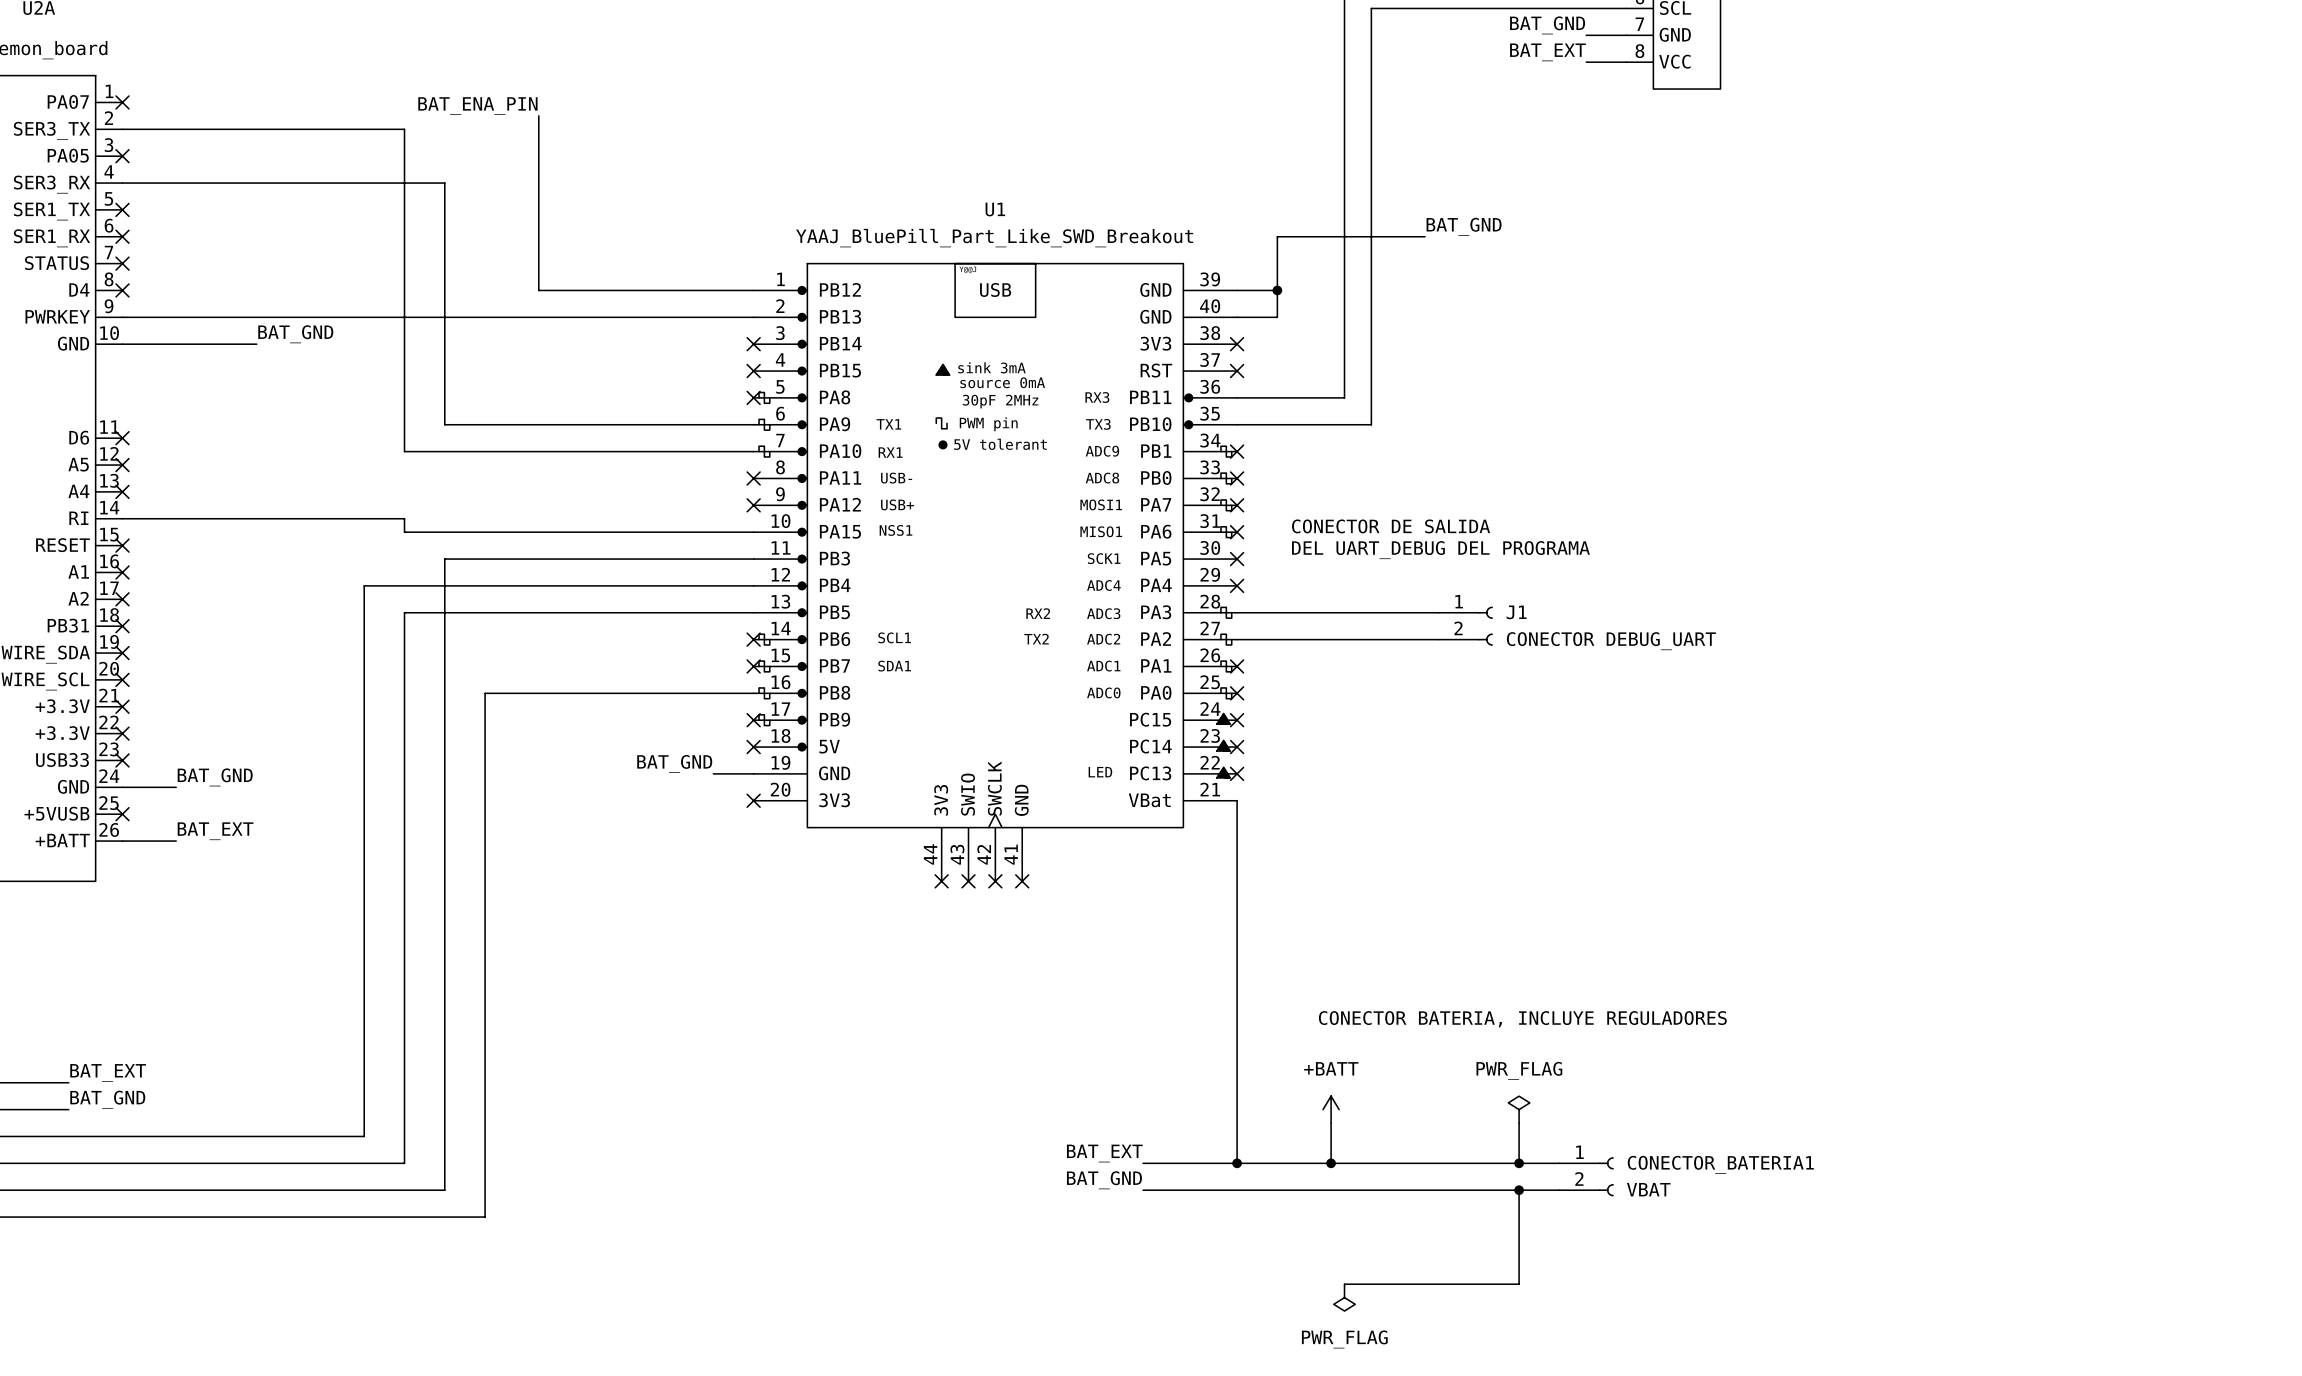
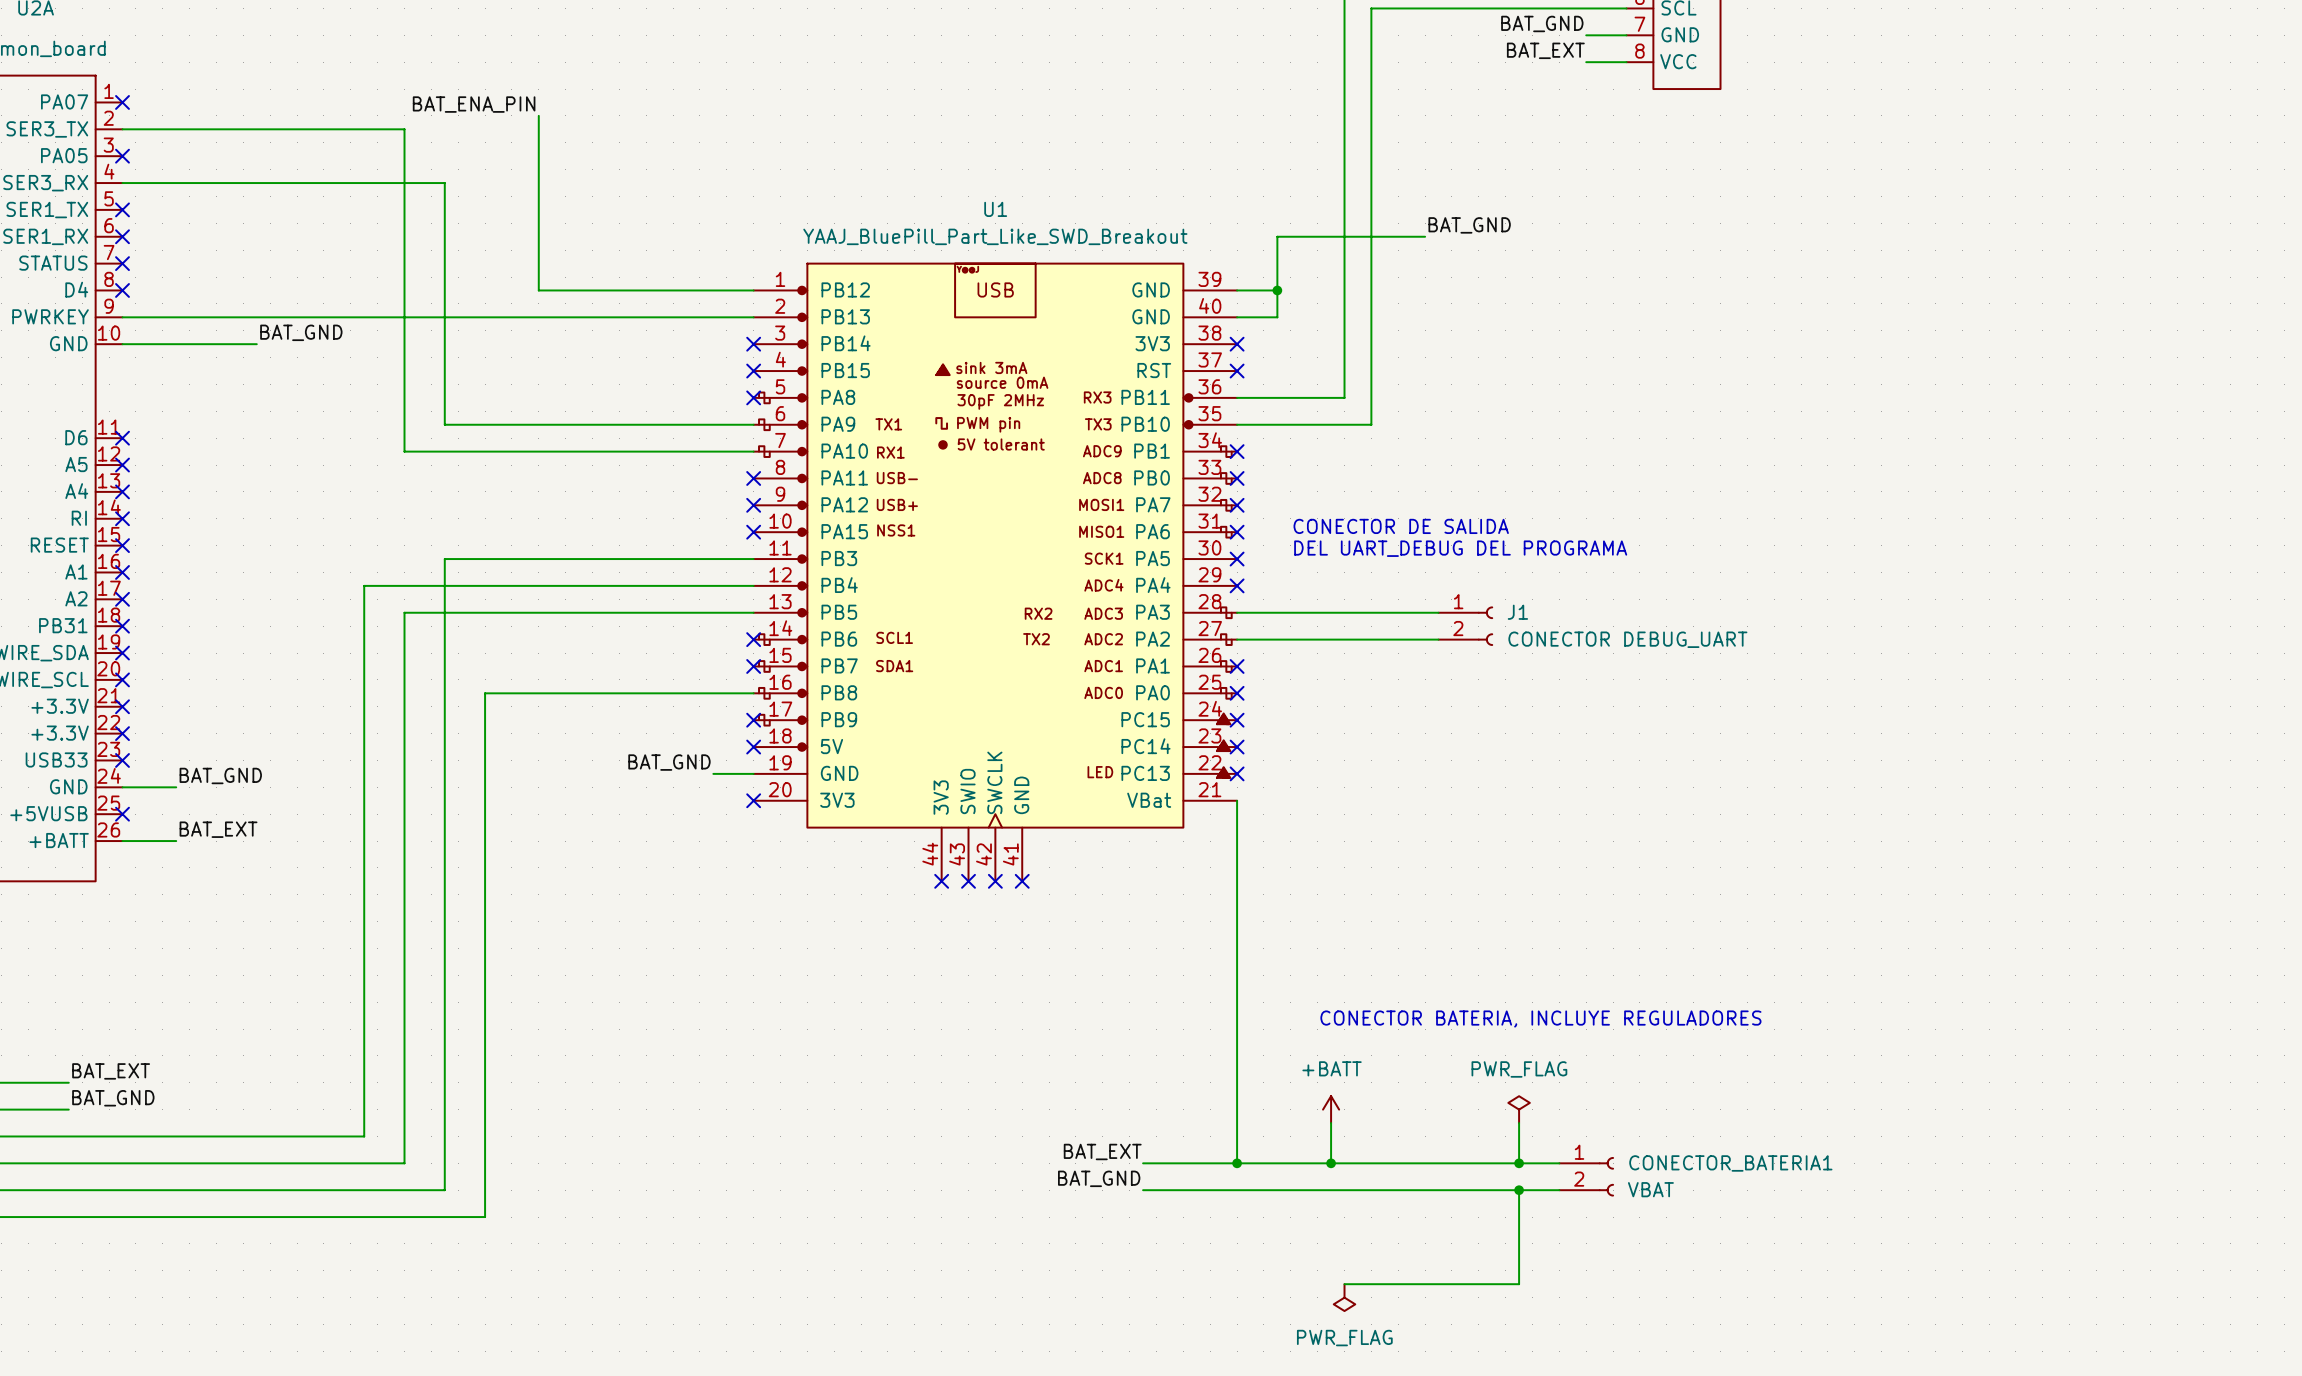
wire: (122, 518) (404, 518) (404, 532) (753, 532) -> none
no-connect mark: none -> (122, 518)
no-connect mark: none -> (753, 532)

